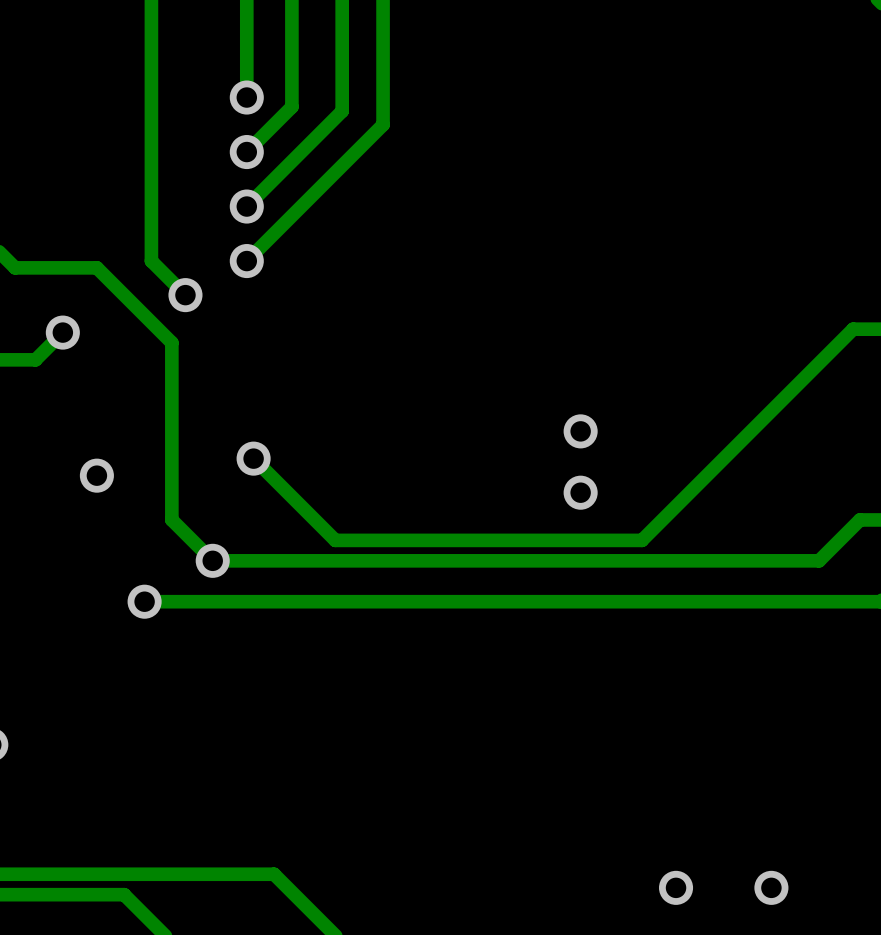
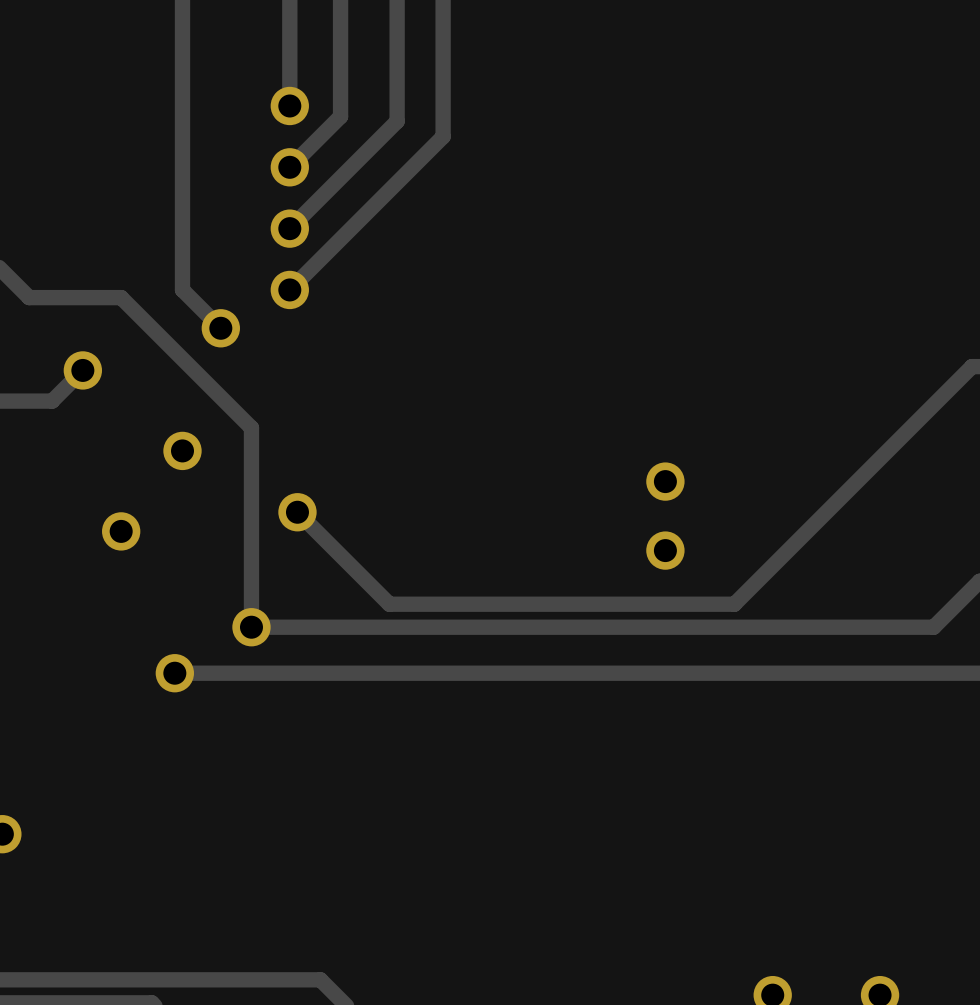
track: (171, 342) (171, 519) (212, 560) -> (205, 381) (251, 427) (251, 627)
via: none -> (182, 450)

